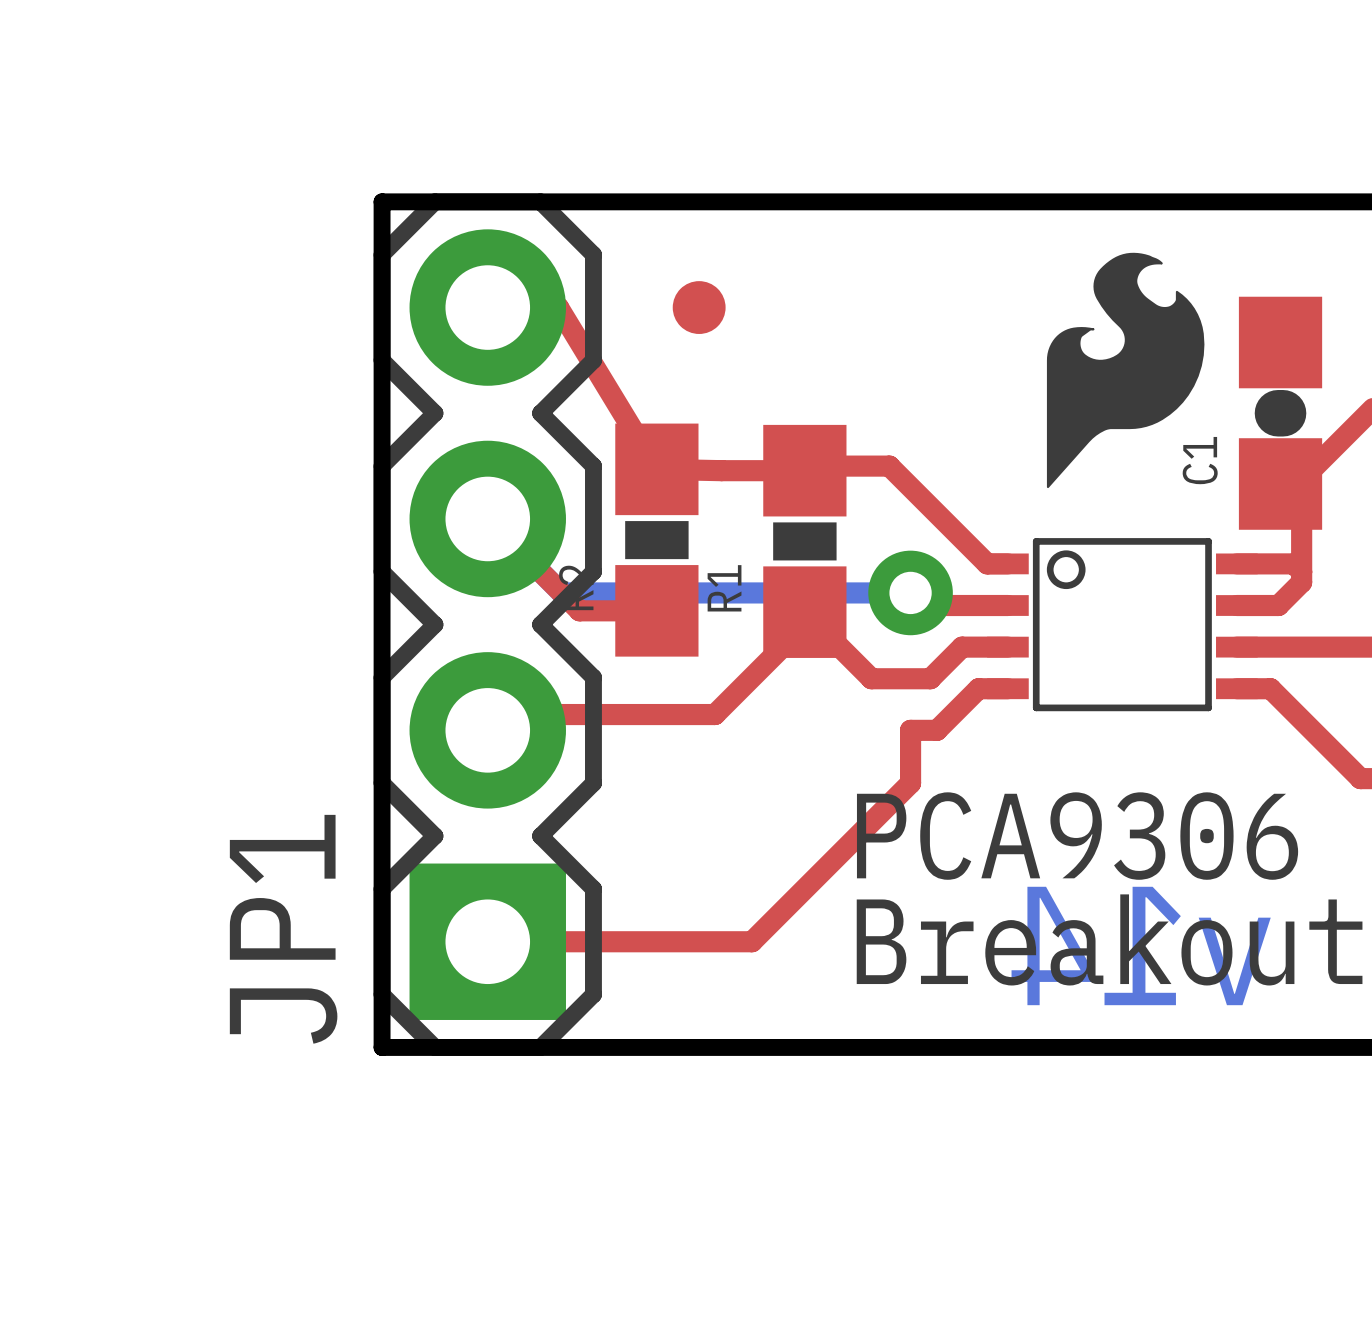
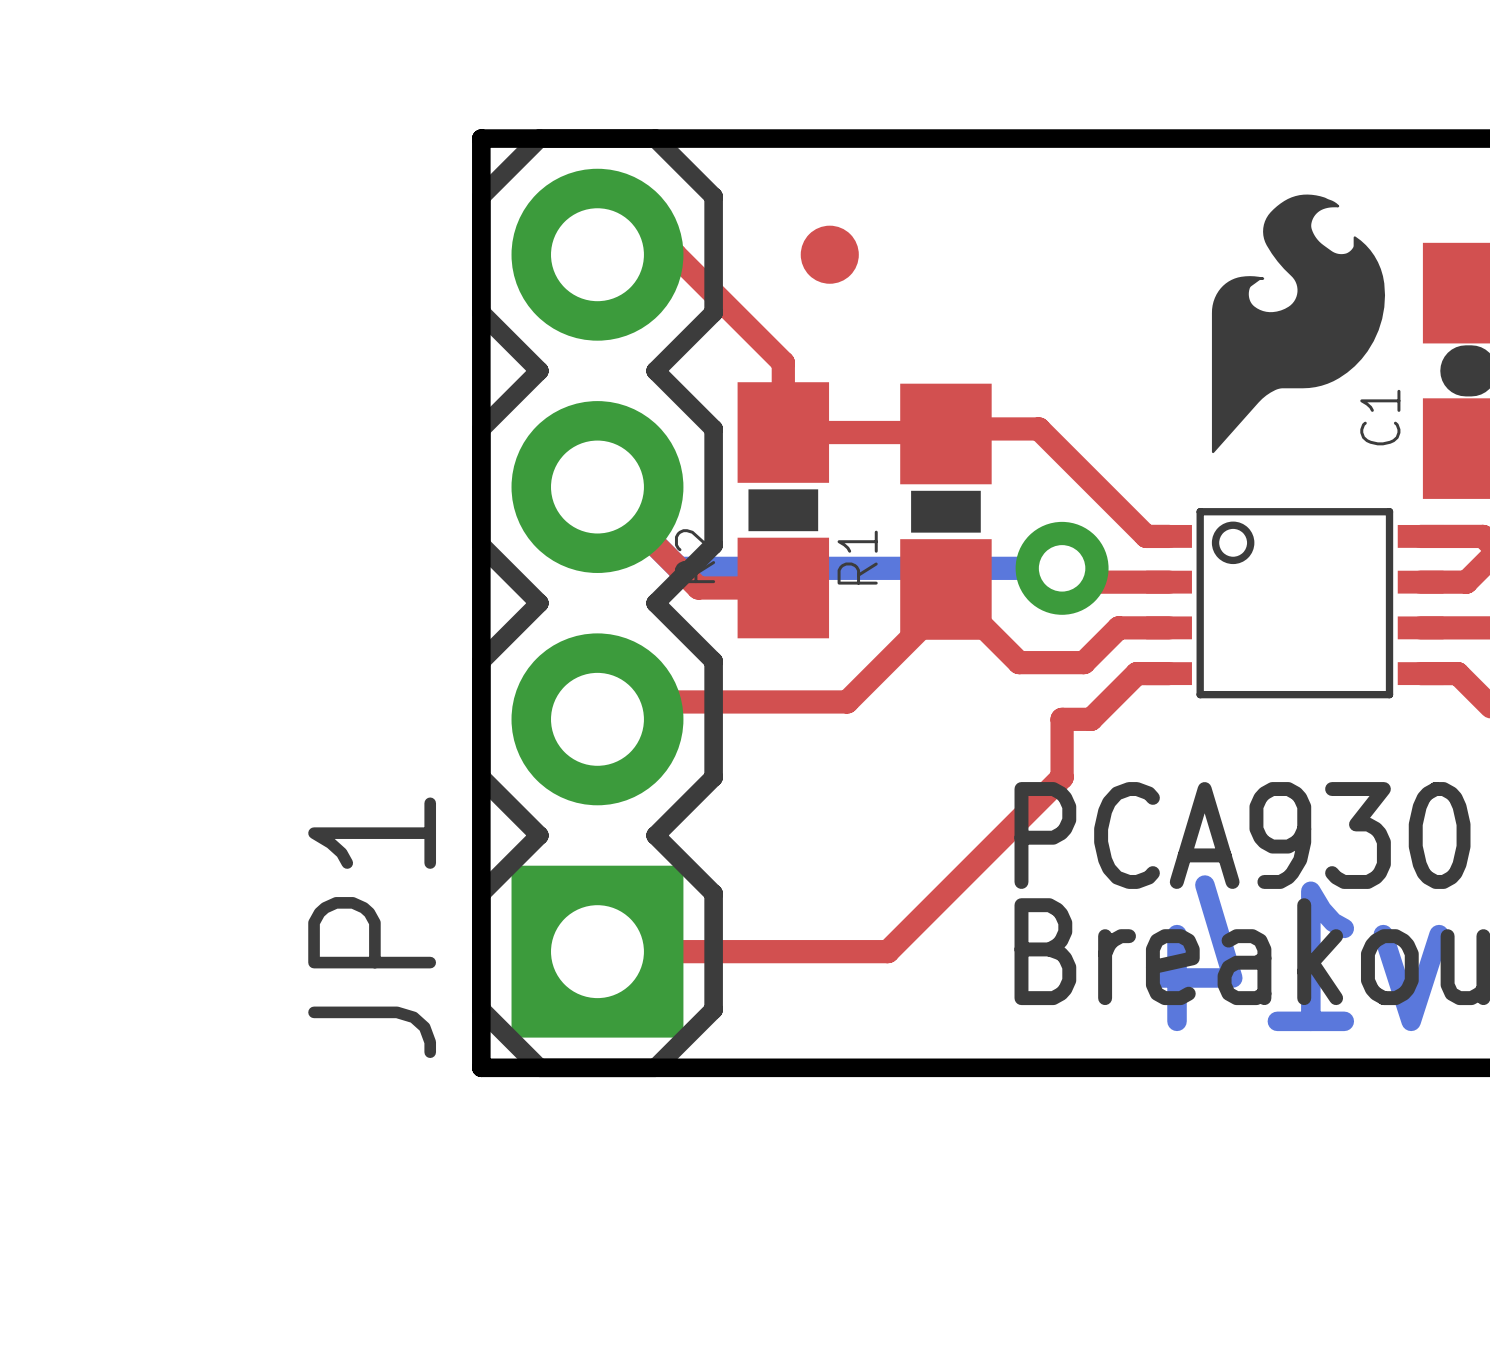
top track: (558, 307) (656, 469) (804, 470) -> (675, 254) (783, 362) (783, 432) (945, 433)

